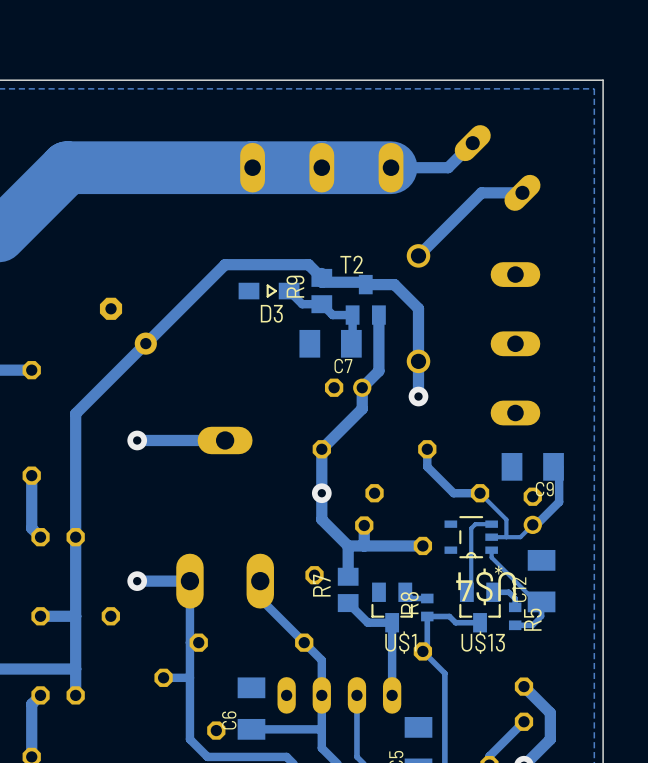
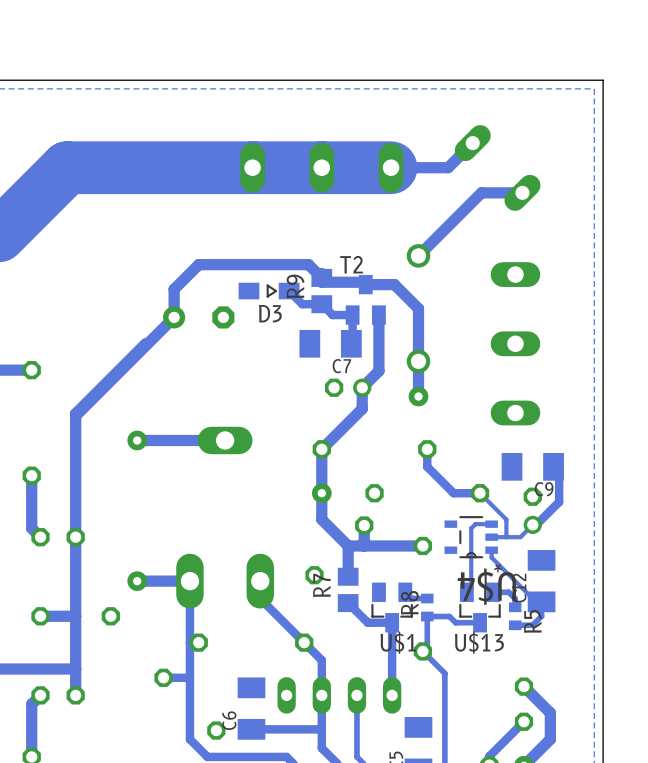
track: (225, 264) (146, 343) -> (225, 264) (198, 264) (174, 289) (174, 317) (75, 415)
part: none -> (198, 317)
part: (128, 326) -> none

